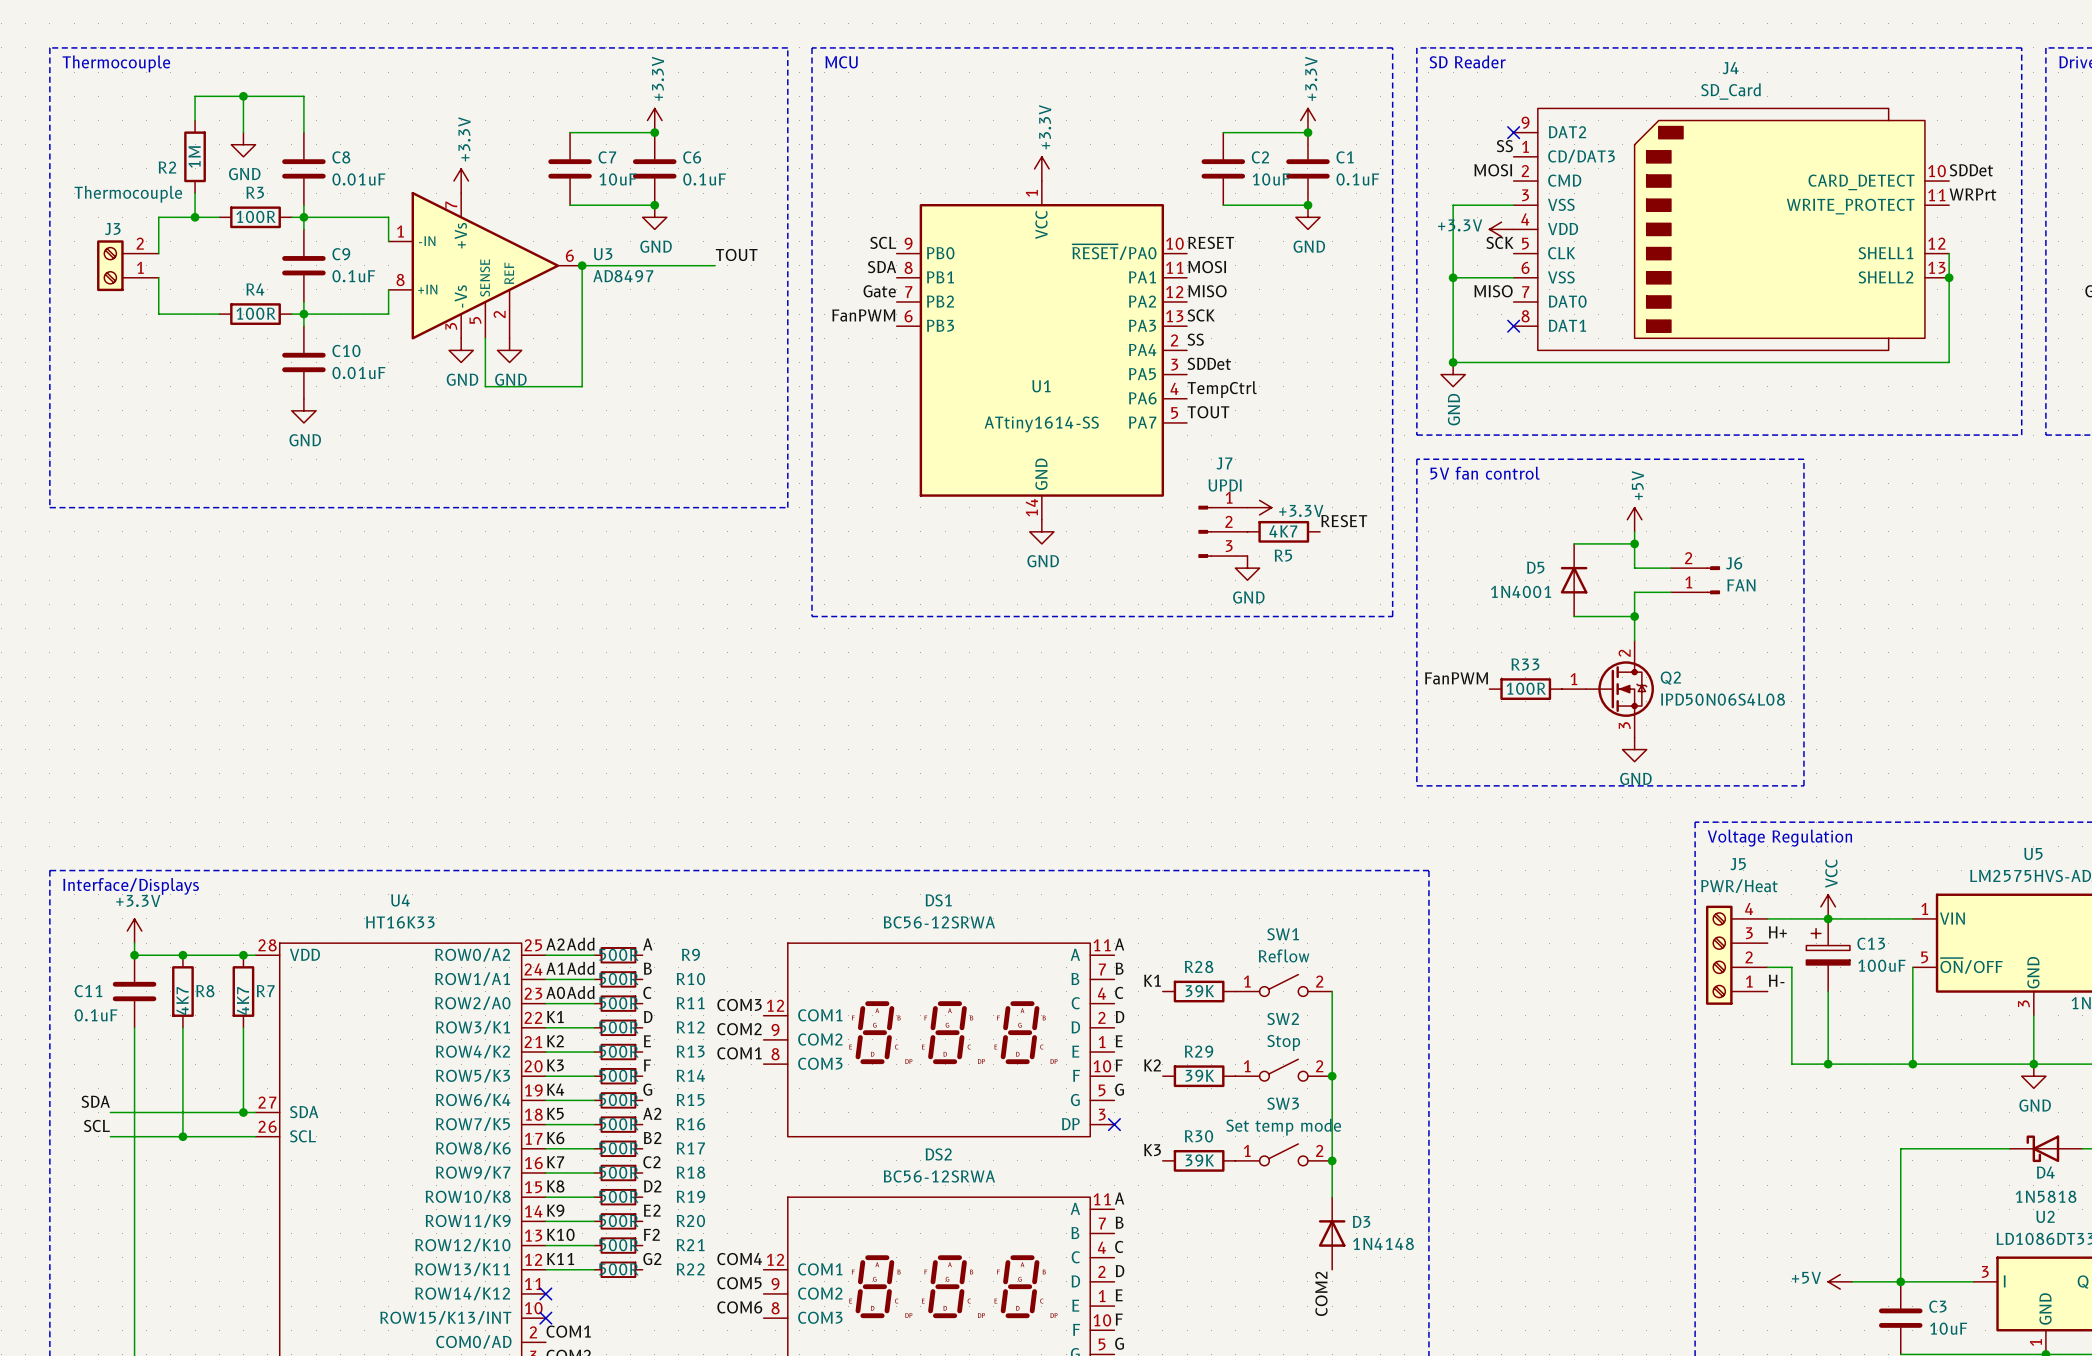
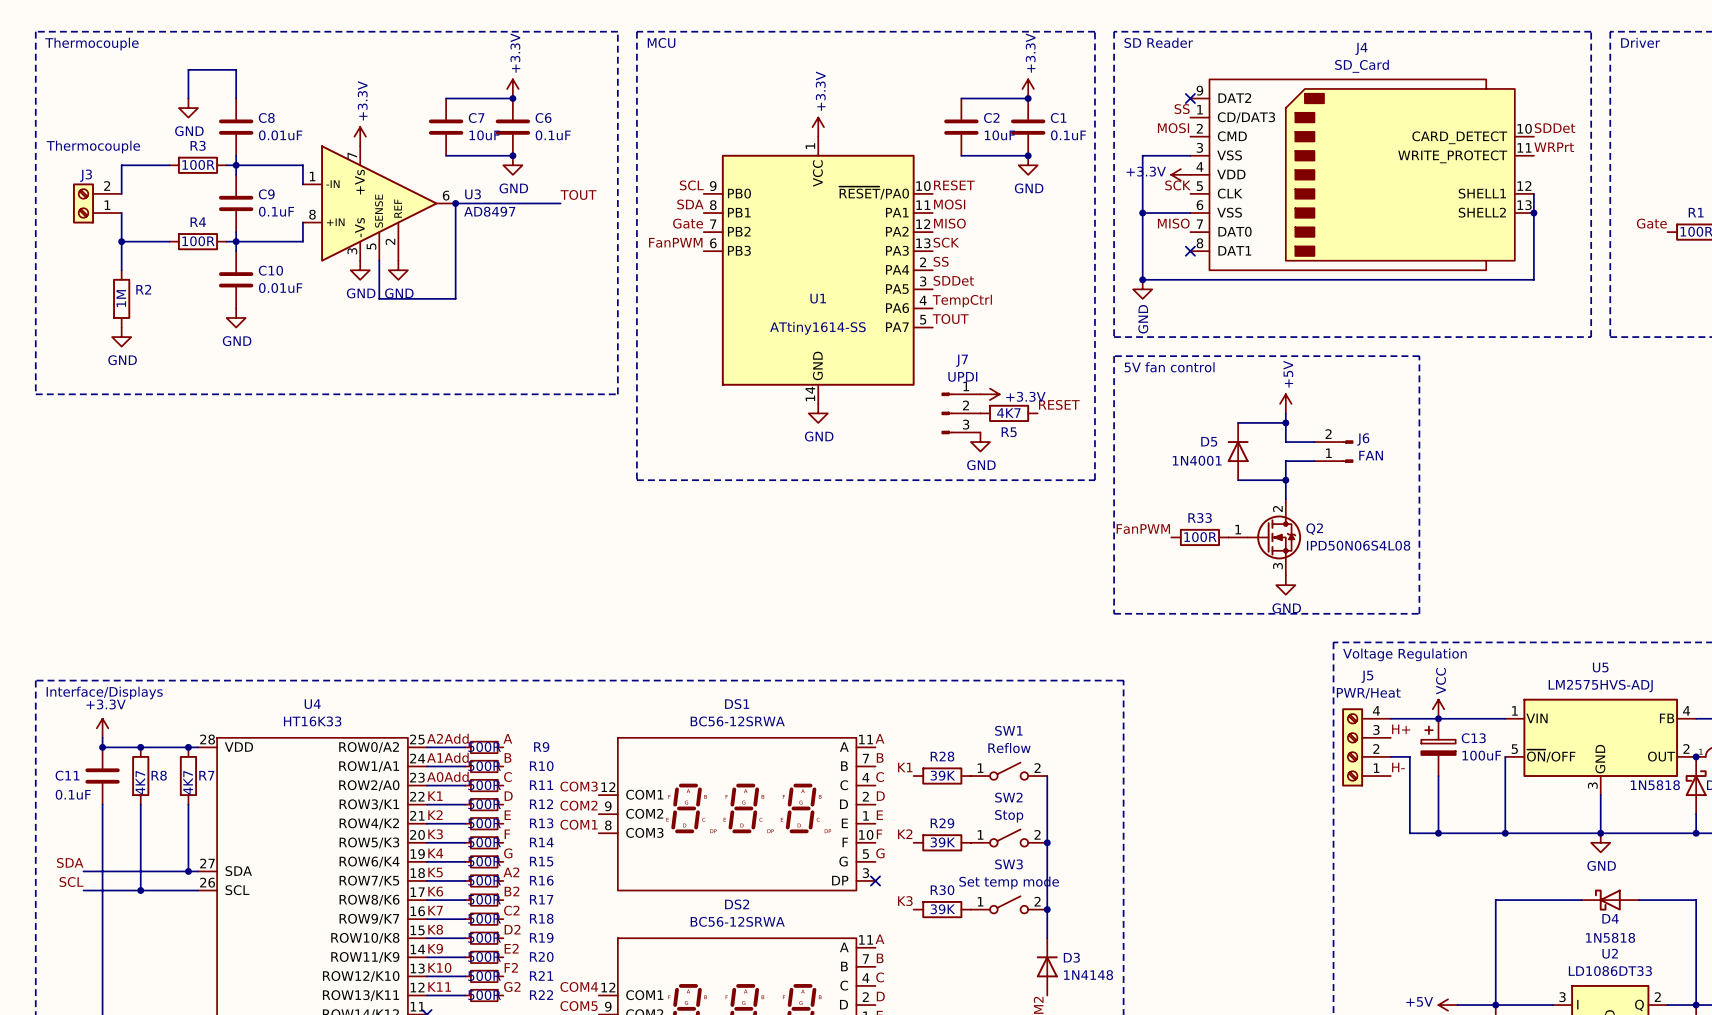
wire: (243, 96) (195, 96) (195, 120) -> none
junction: (243, 96) -> none
R2 position: (195, 156) -> (121, 298)
R2 value position: 1M (194, 157) -> 1M (121, 298)
R2 name position: R2 (167, 167) -> R2 (143, 289)
wire: (195, 193) (195, 217) -> none
junction: (195, 217) -> none
wire: none -> (121, 241) (121, 270)
junction: none -> (121, 241)
power symbol: none -> GND (121, 337)

